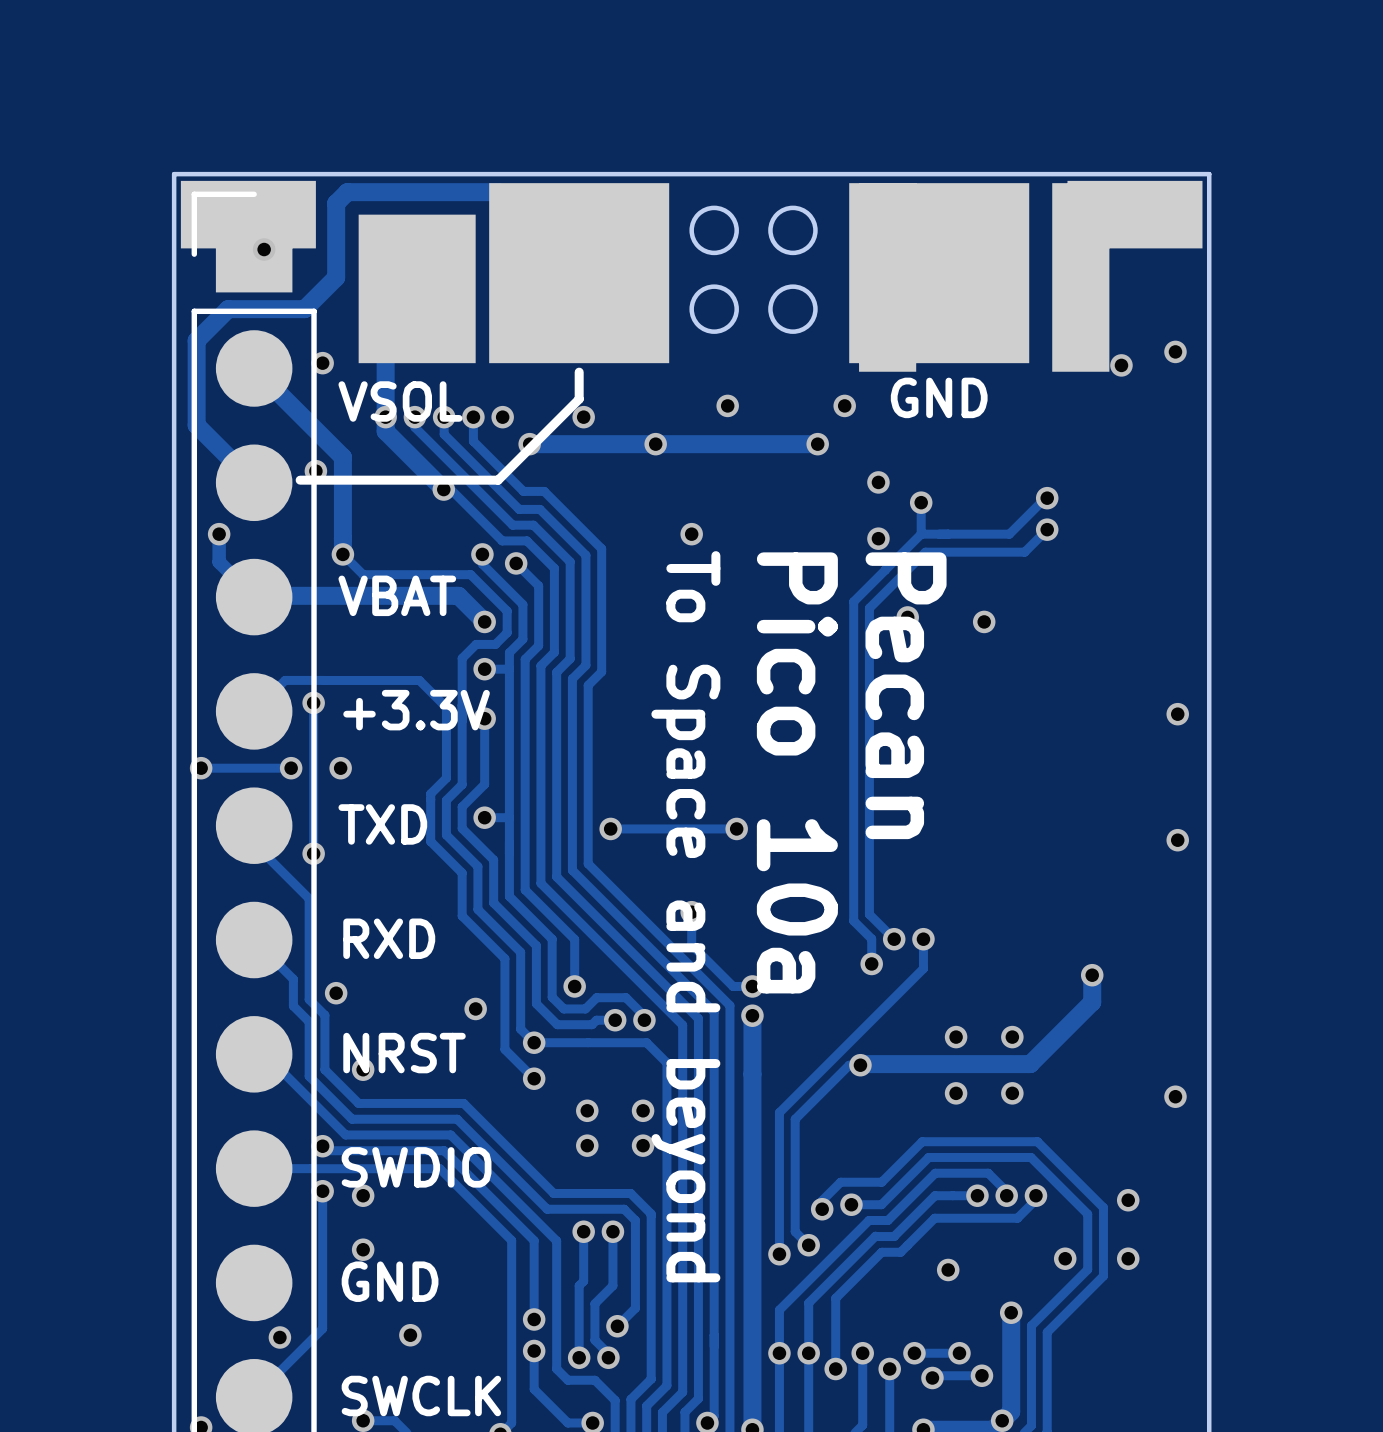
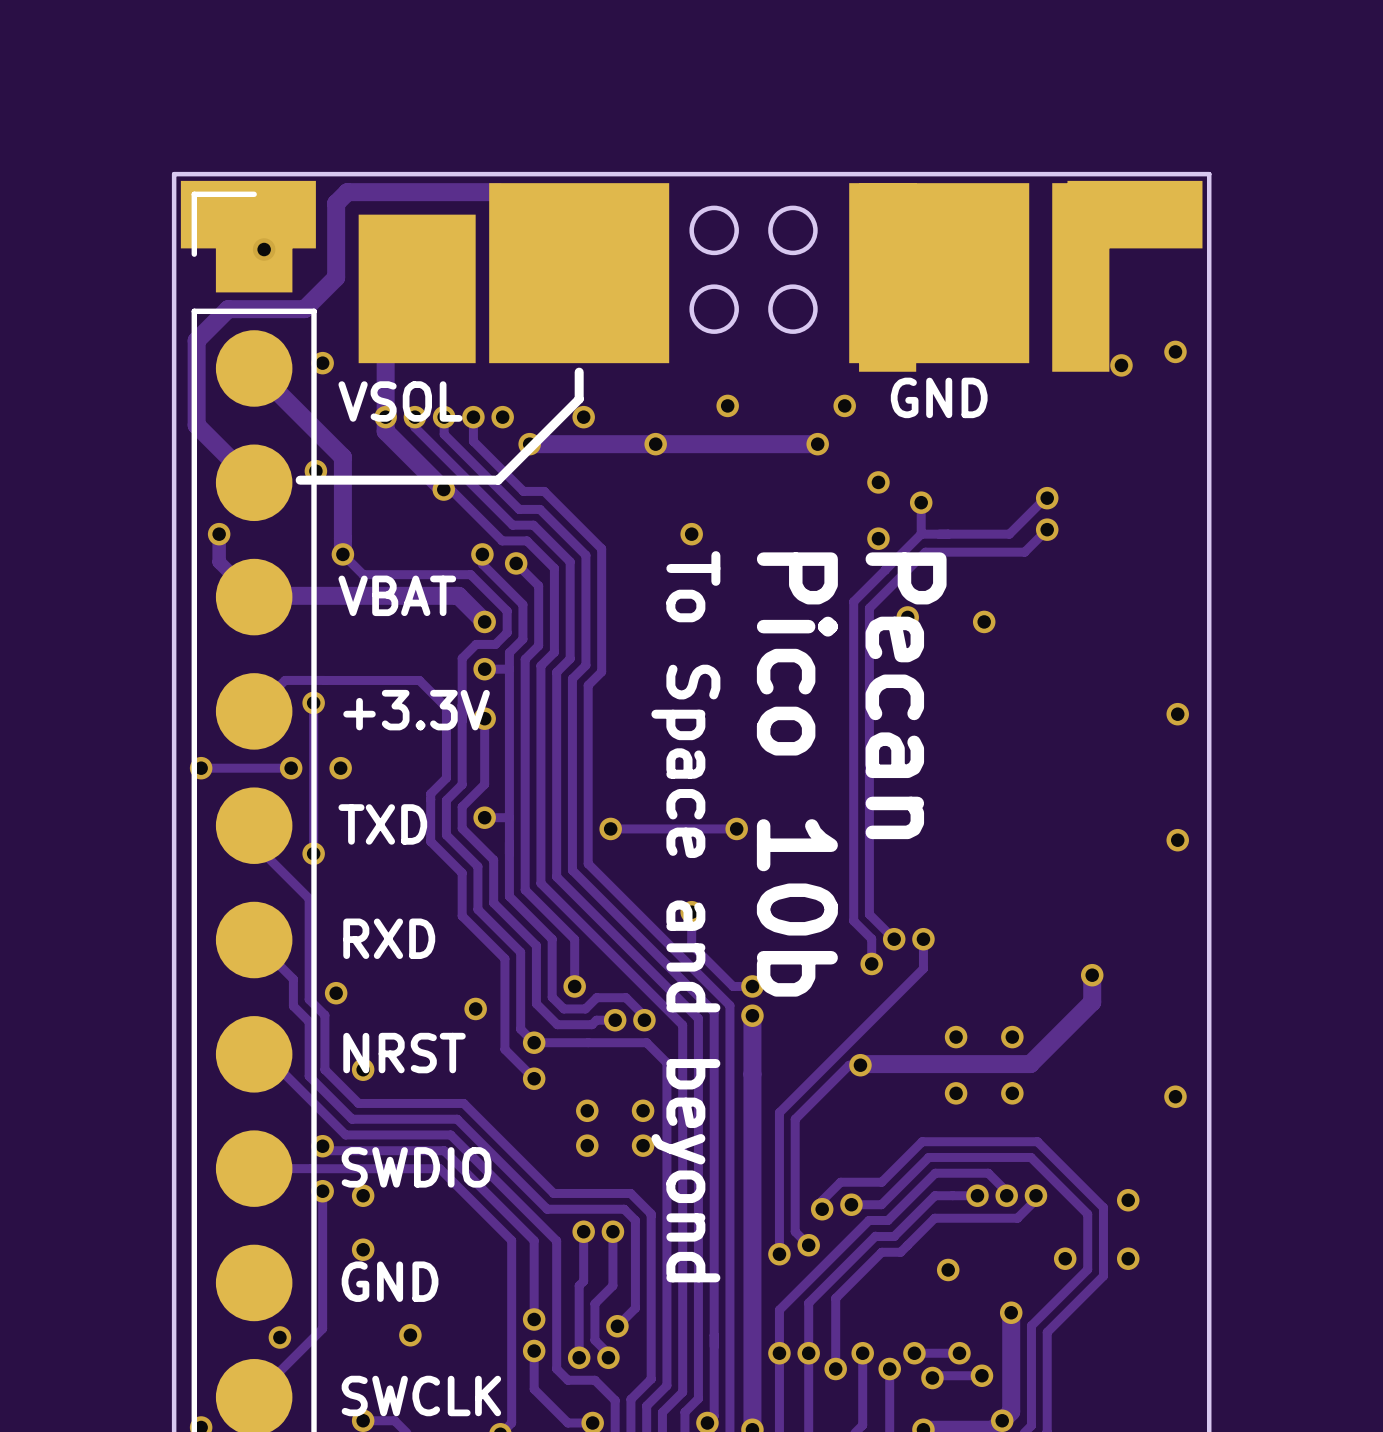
text: Pico 10a (797, 772) -> Pico 10b (797, 774)

